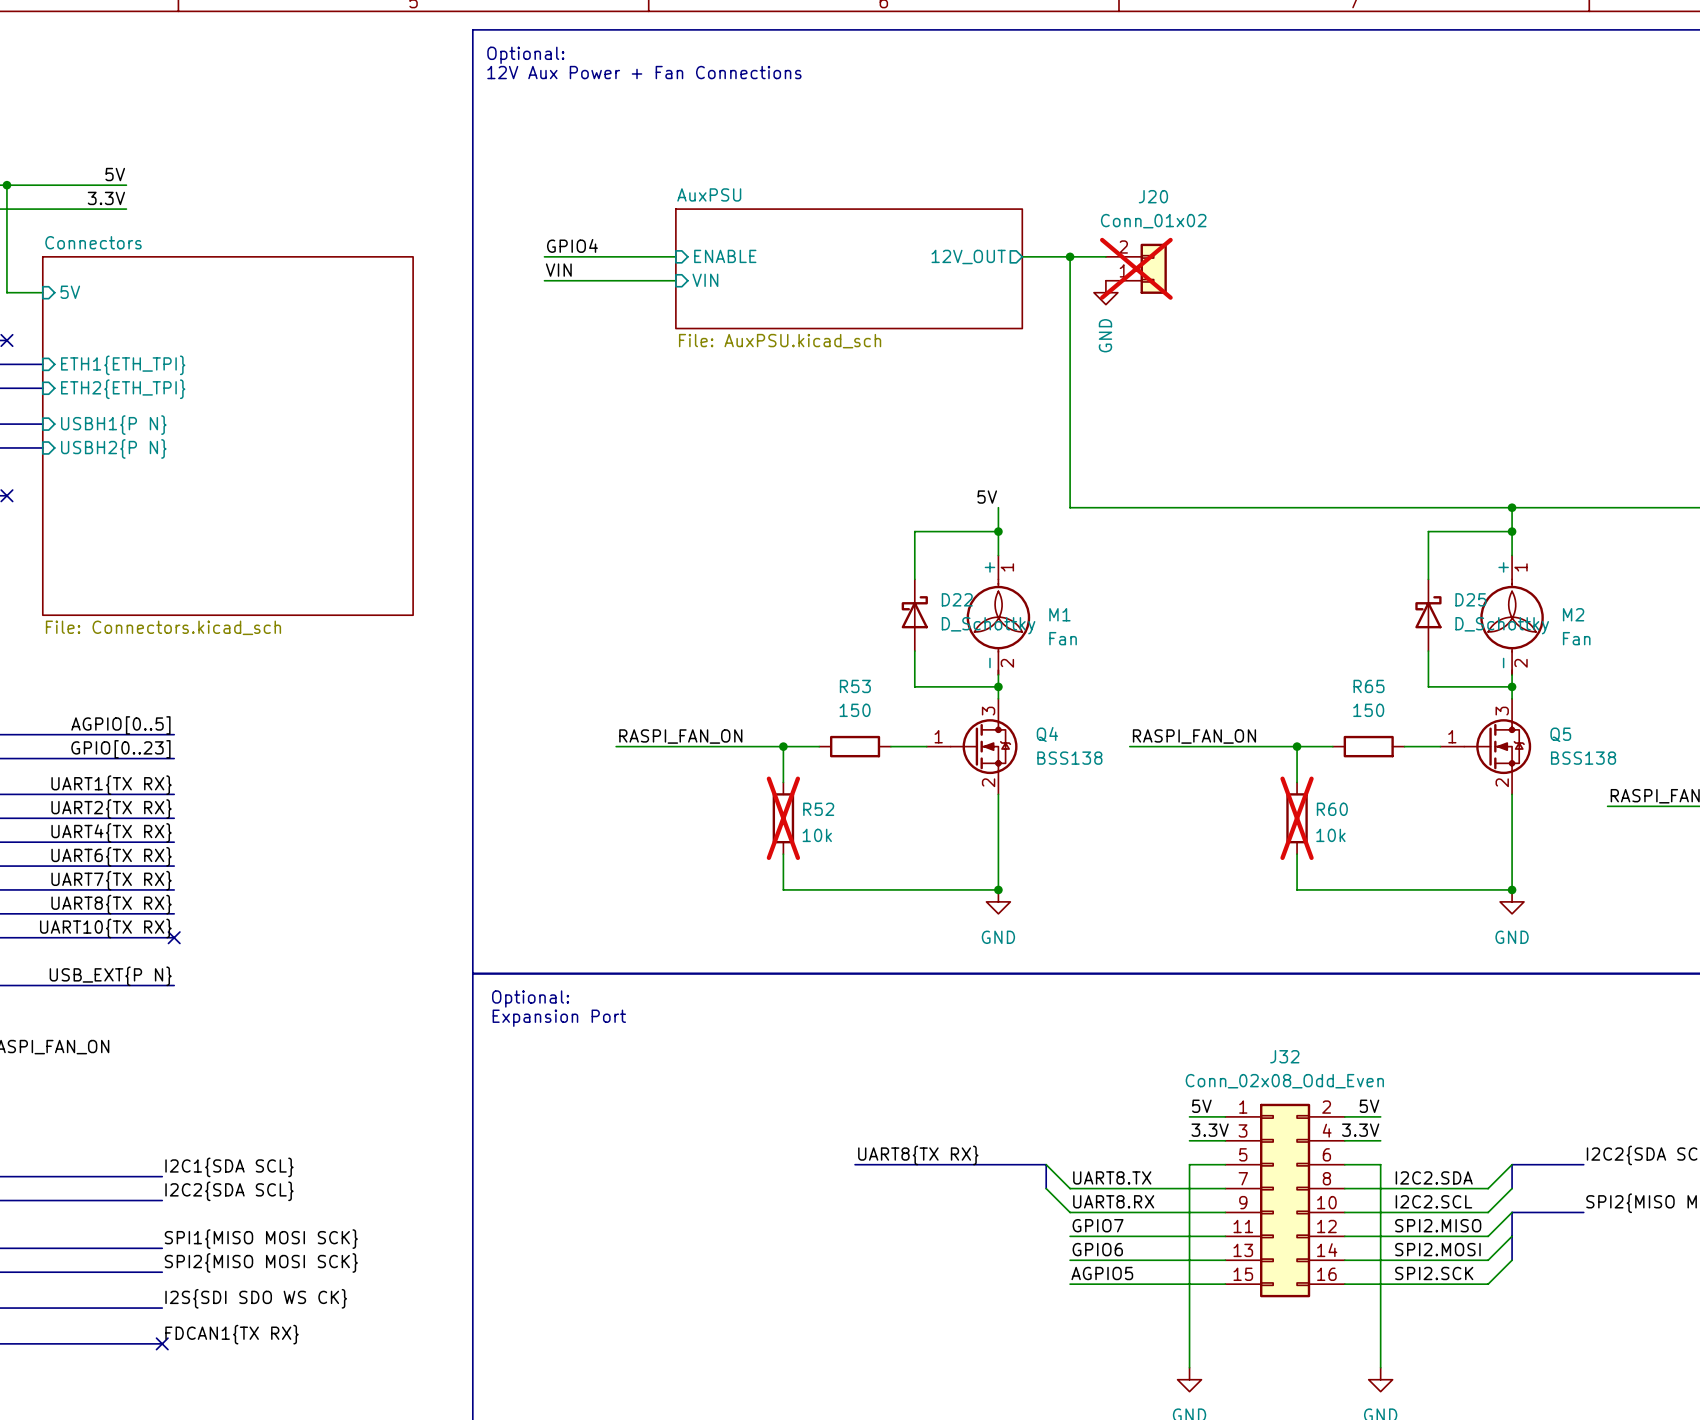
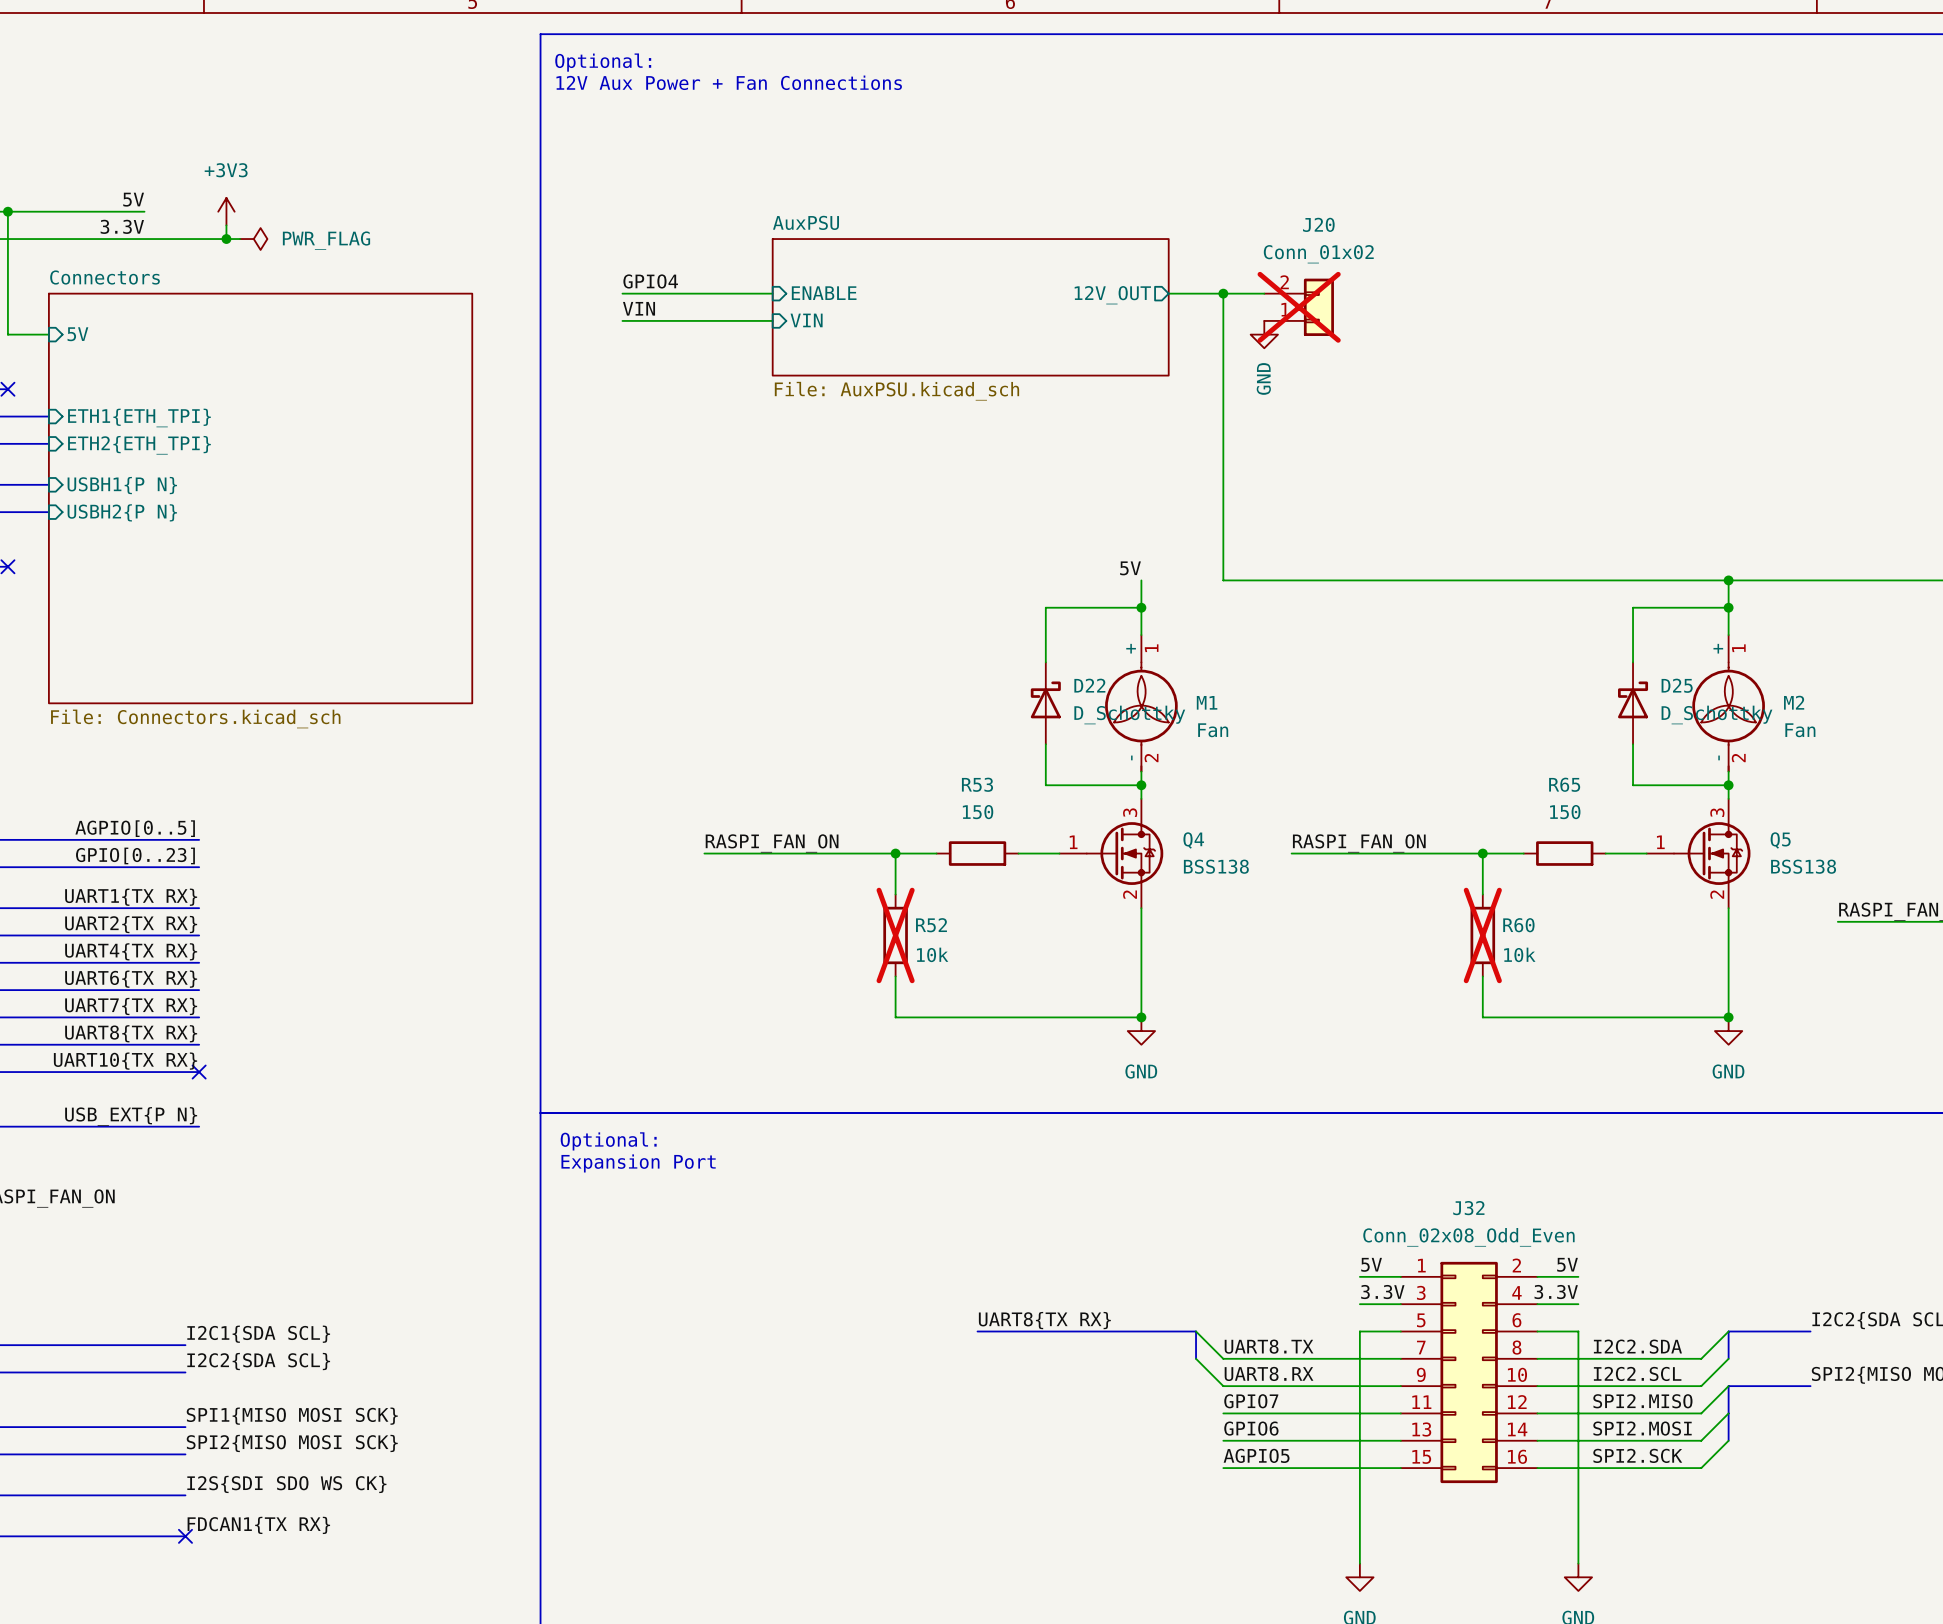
power symbol: none -> +3V3 (226, 211)
wire: none -> (226, 225) (226, 239)
wire: none -> (144, 239) (240, 239)
junction: none -> (226, 239)
power symbol: none -> PWR_FLAG (253, 239)

